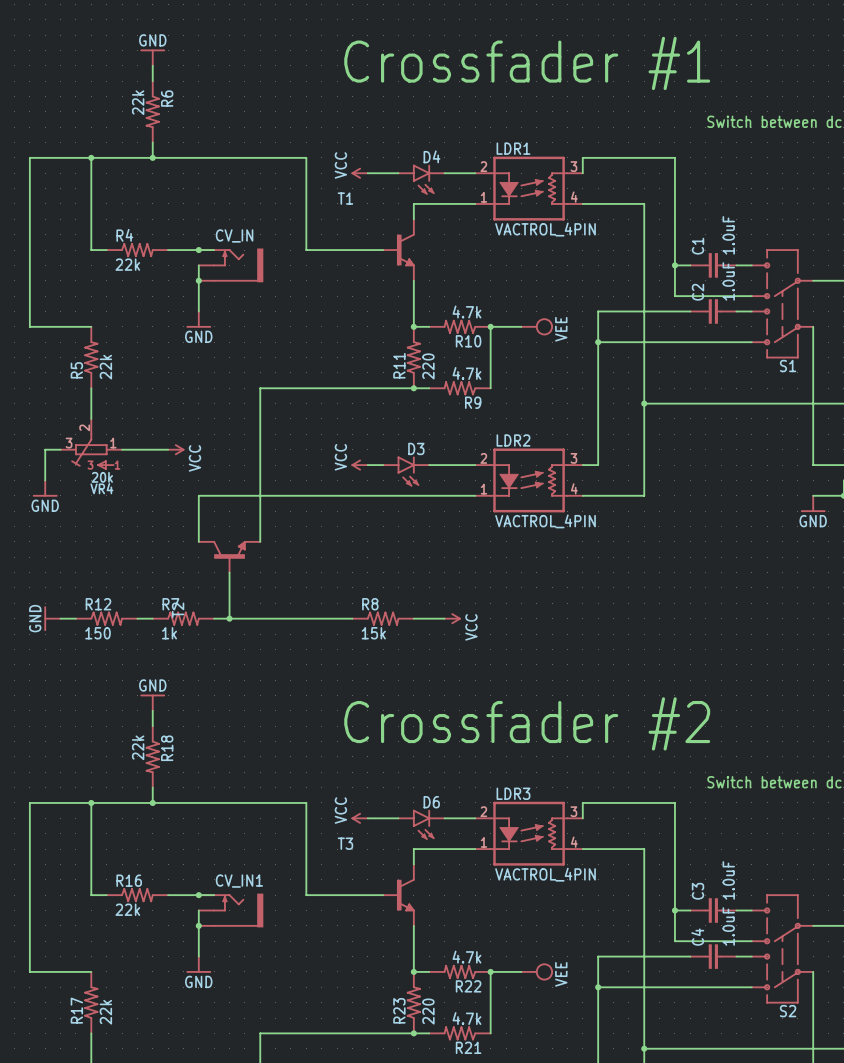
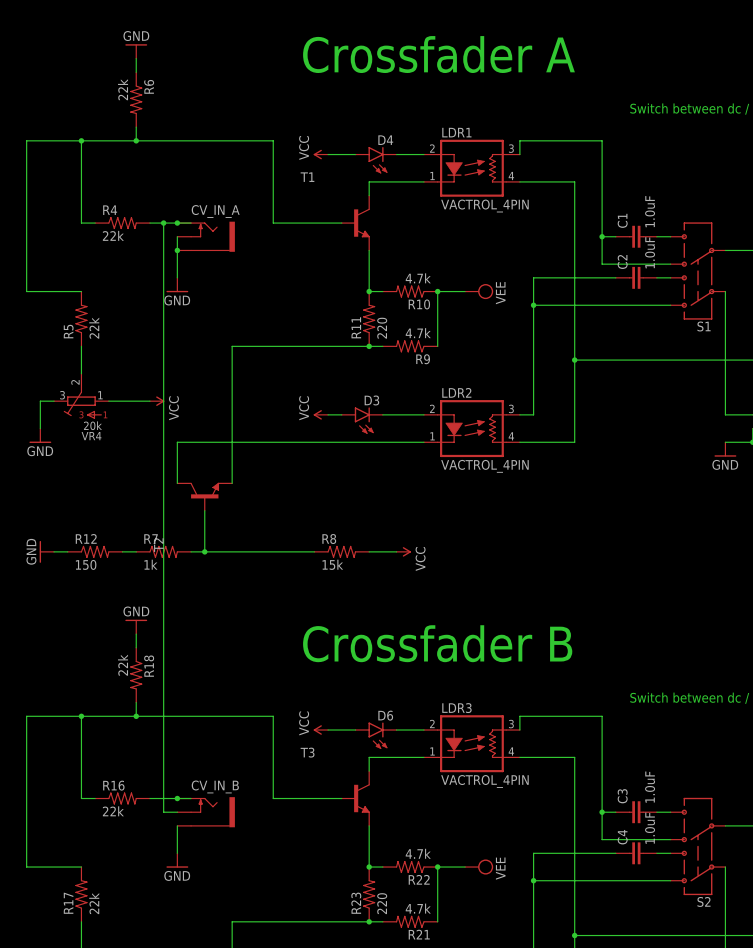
text: Crossfader #1 (527, 63) -> Crossfader A (438, 54)
CV_IN name: CV_IN (234, 235) -> CV_IN_A (215, 211)
junction: none -> (163, 223)
text: Crossfader #2 (527, 723) -> Crossfader B (437, 643)
CV_IN1 name: CV_IN1 (239, 881) -> CV_IN_B (215, 786)
wire: (198, 910) (198, 925) -> (177, 812) (163, 812) (163, 223)
junction: (198, 925) -> none

